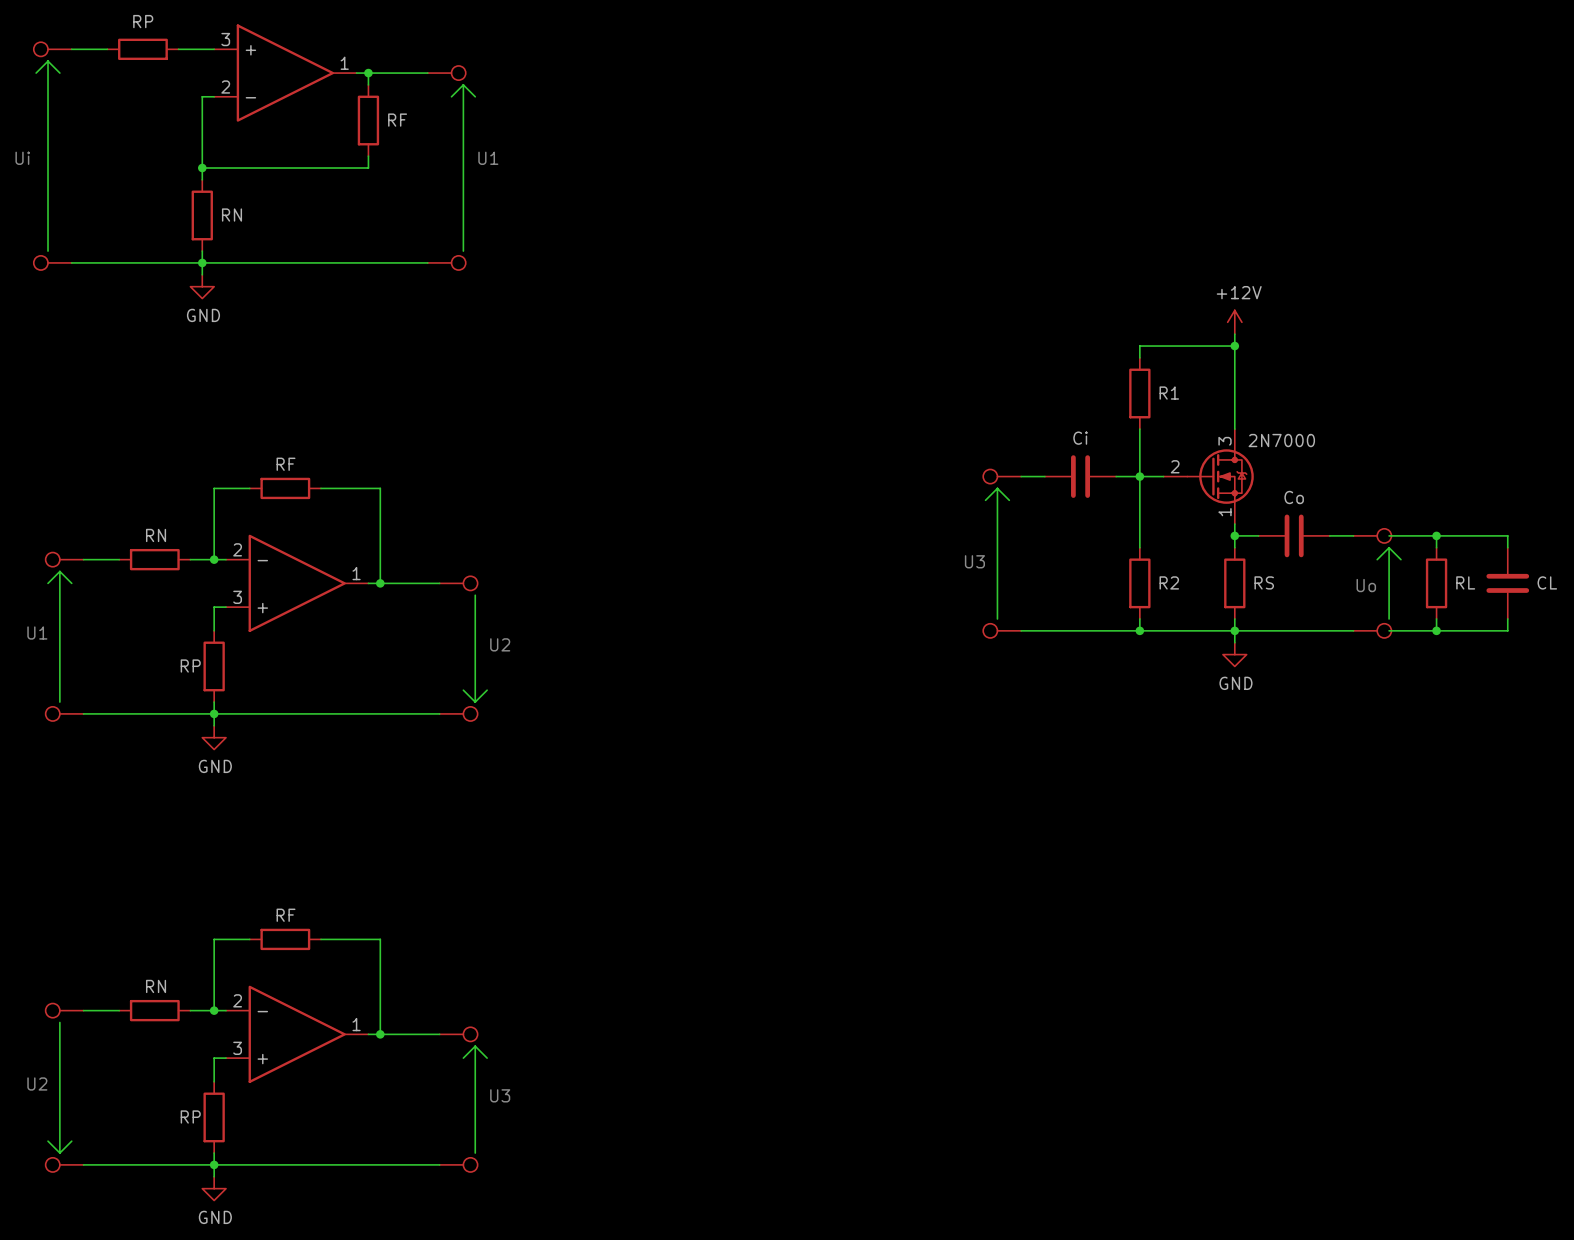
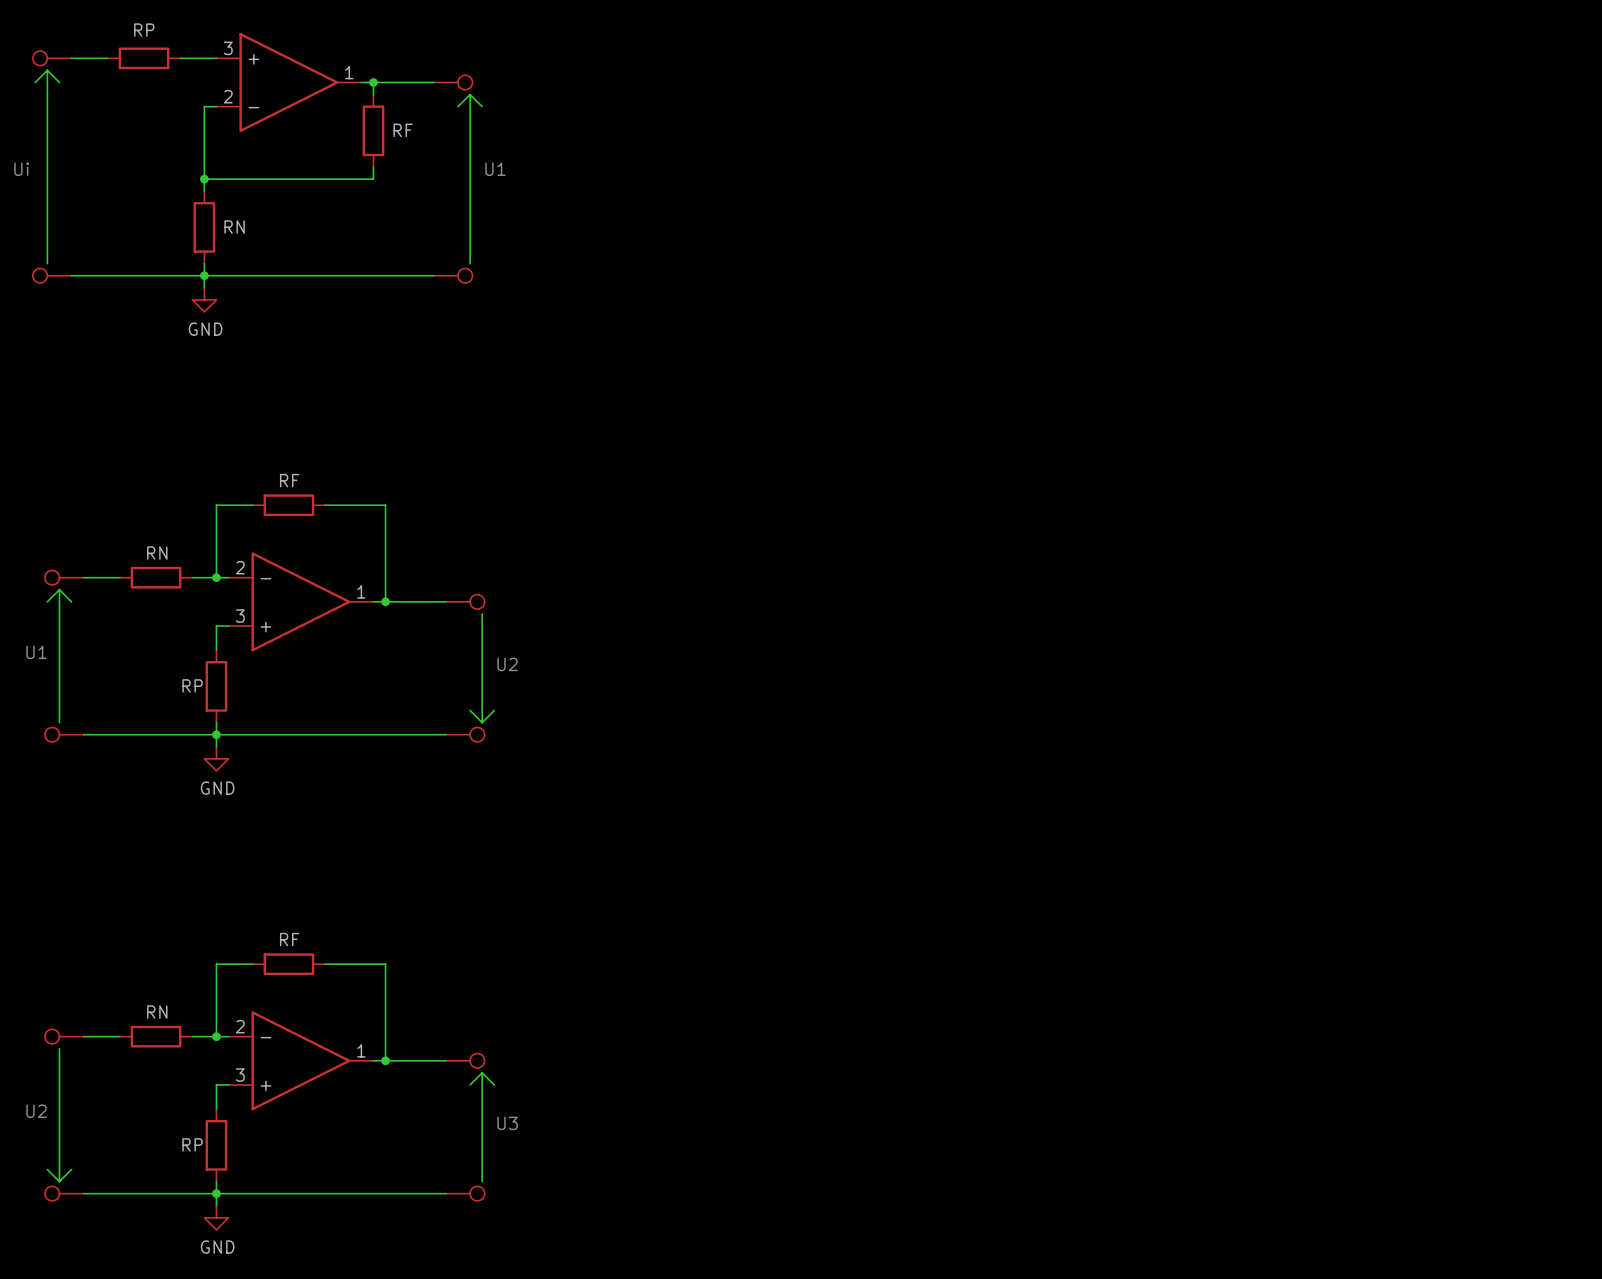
power symbol: +12V (1234, 322) -> none
wire: (1234, 334) (1234, 429) -> none
wire: (1234, 346) (1139, 346) (1139, 357) -> none
junction: (1234, 346) -> none
R1: (1139, 393) -> none
wire: (1139, 429) (1139, 547) -> none
part: (1002, 476) -> none
wire: (1021, 476) (1044, 476) -> none
Ci: (1080, 476) -> none
wire: (1116, 476) (1163, 476) -> none
junction: (1139, 476) -> none
part: 2N7000 (1208, 476) -> none
wire: (997, 488) (997, 618) -> none
wire: (997, 488) (1009, 500) -> none
wire: (997, 488) (985, 500) -> none
wire: (1234, 524) (1234, 547) -> none
wire: (1234, 535) (1258, 535) -> none
junction: (1234, 535) -> none
Co: (1294, 535) -> none
wire: (1329, 535) (1353, 535) -> none
part: (1372, 535) -> none
wire: (1389, 535) (1507, 535) (1507, 547) -> none
wire: (1436, 535) (1436, 547) -> none
junction: (1436, 535) -> none
wire: (1389, 547) (1389, 618) -> none
wire: (1389, 547) (1400, 559) -> none
wire: (1389, 547) (1377, 559) -> none
text: U3 (974, 561) -> none
R2: (1139, 583) -> none
RS: (1234, 583) -> none
RL: (1436, 583) -> none
CL: (1507, 583) -> none
text: Uo (1366, 585) -> none
wire: (1139, 618) (1139, 630) -> none
wire: (1234, 618) (1234, 642) -> none
wire: (1436, 618) (1436, 630) -> none
wire: (1507, 618) (1507, 630) (1389, 630) -> none
part: (1002, 630) -> none
wire: (1021, 630) (1353, 630) -> none
junction: (1139, 630) -> none
junction: (1234, 630) -> none
part: (1372, 630) -> none
junction: (1436, 630) -> none
power symbol: GND (1234, 654) -> none

